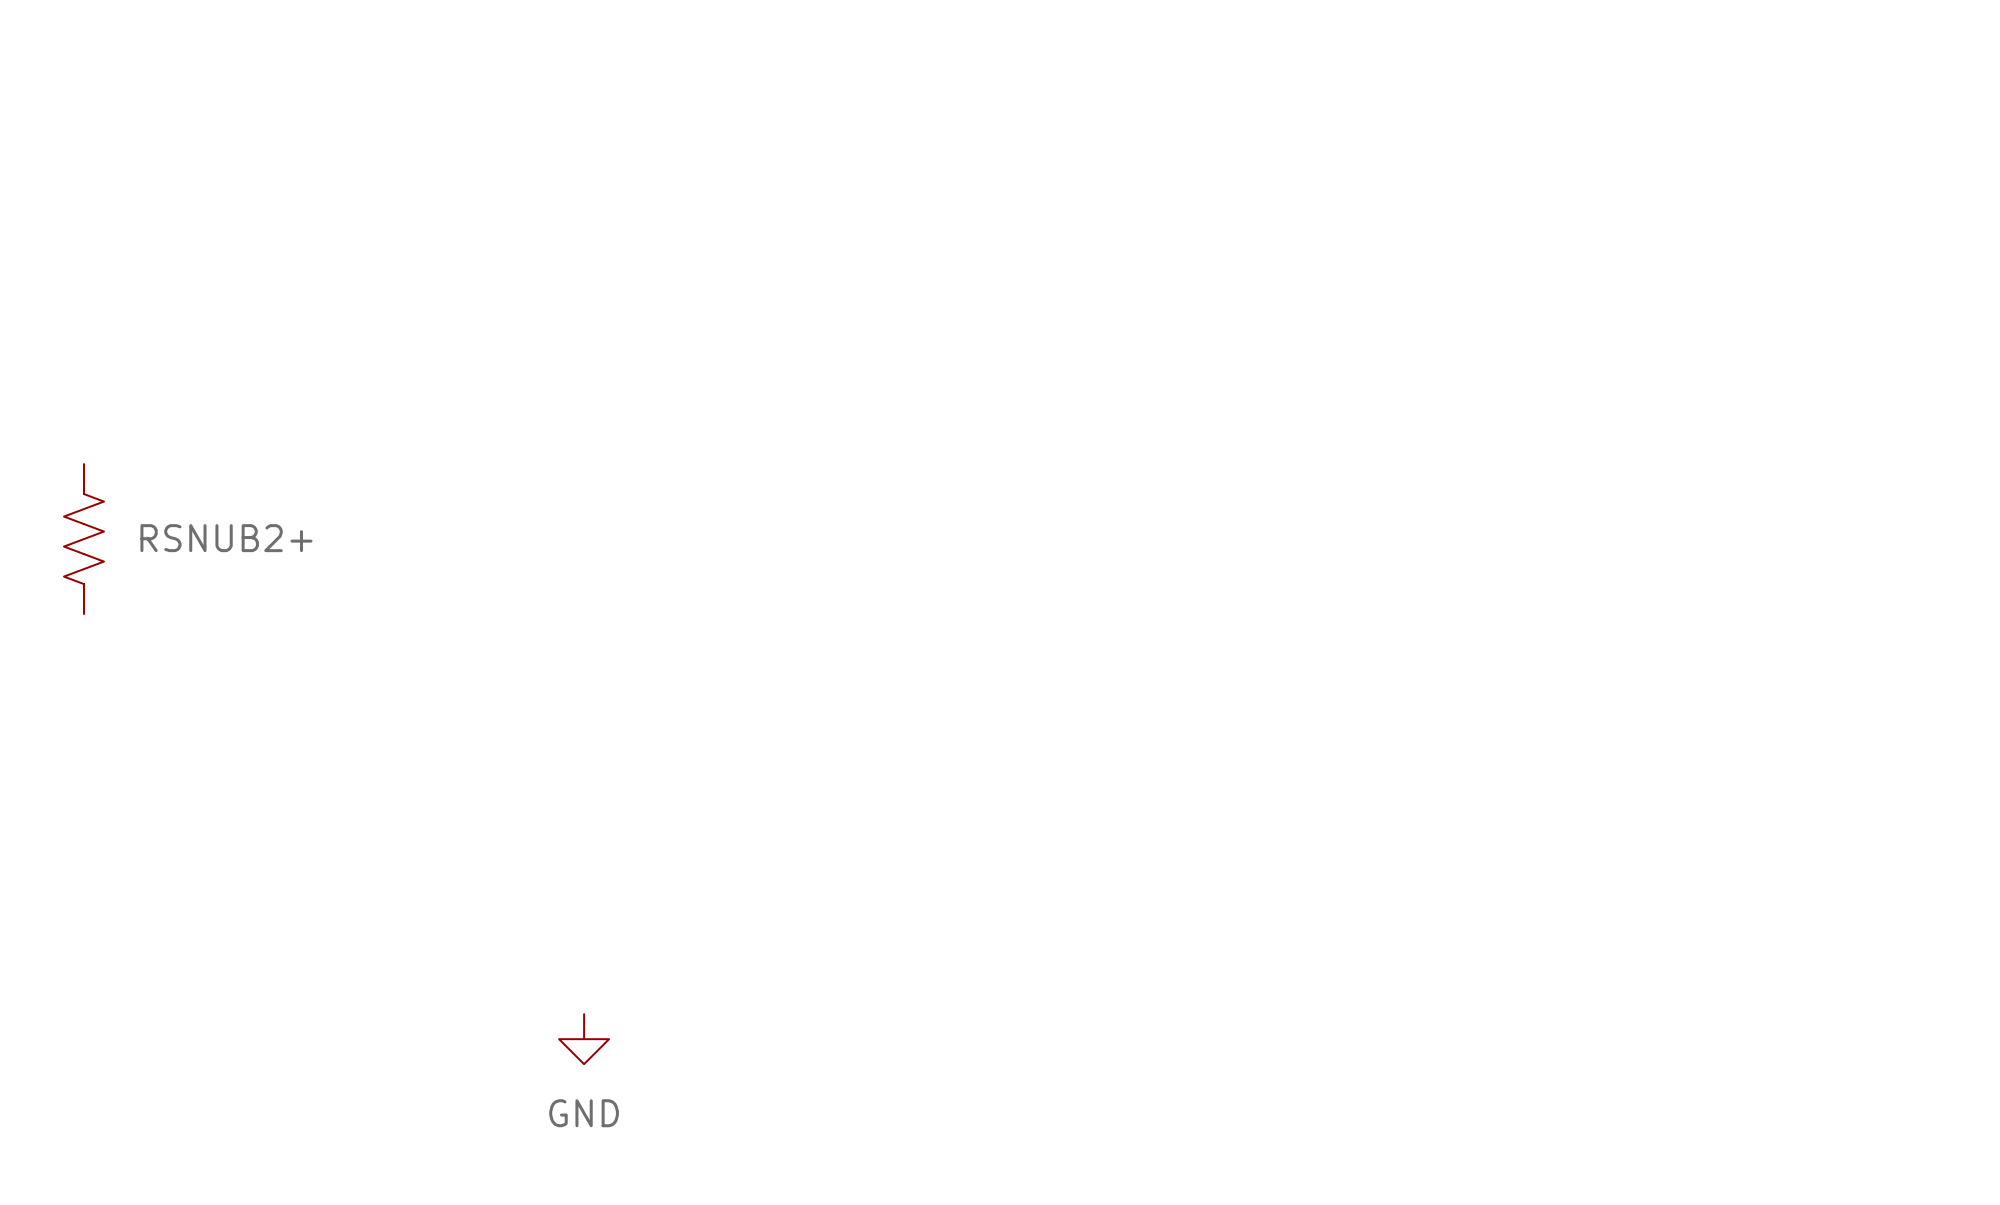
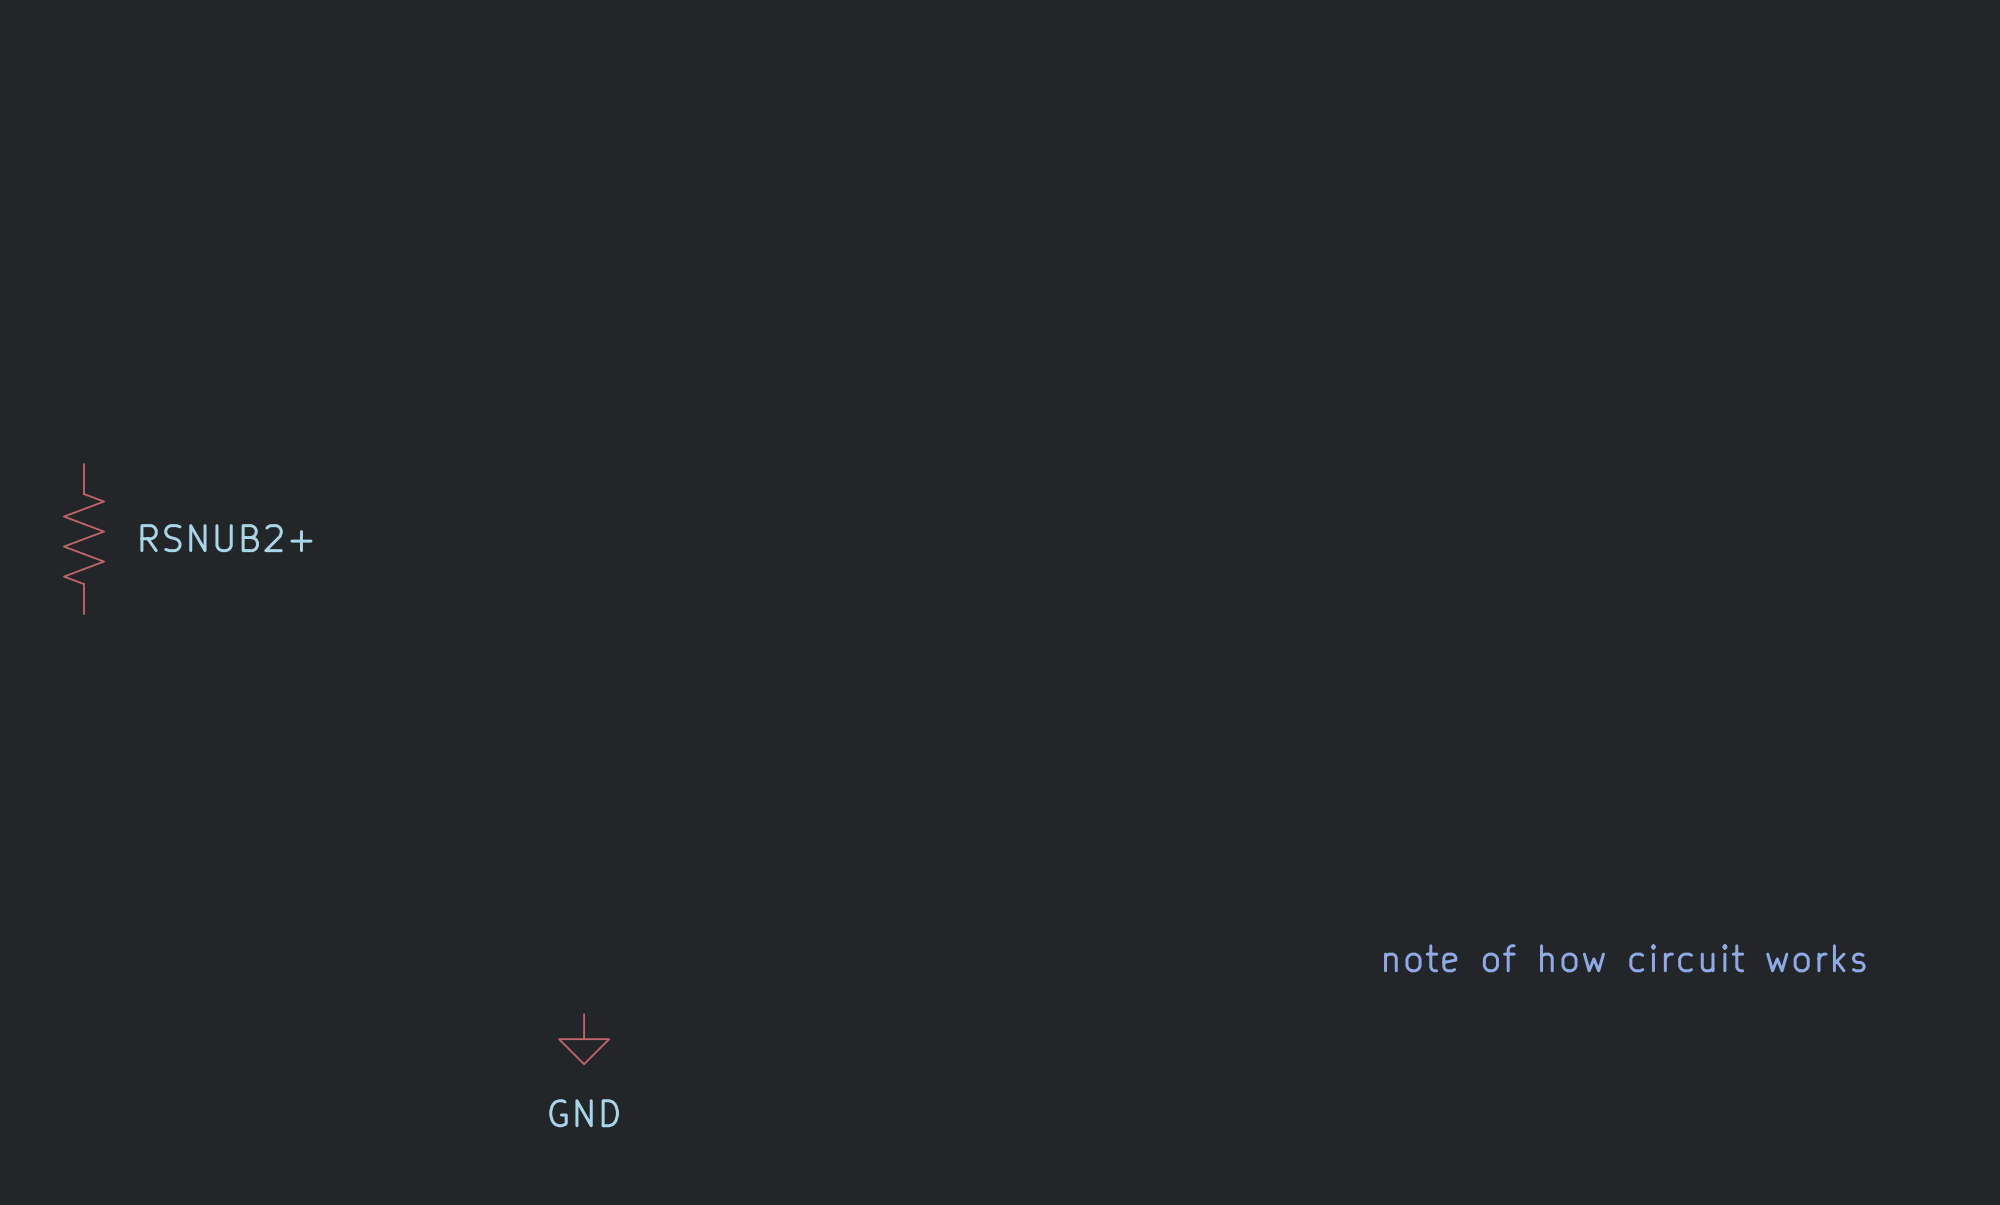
text: none -> note of how circuit works (1624, 958)

